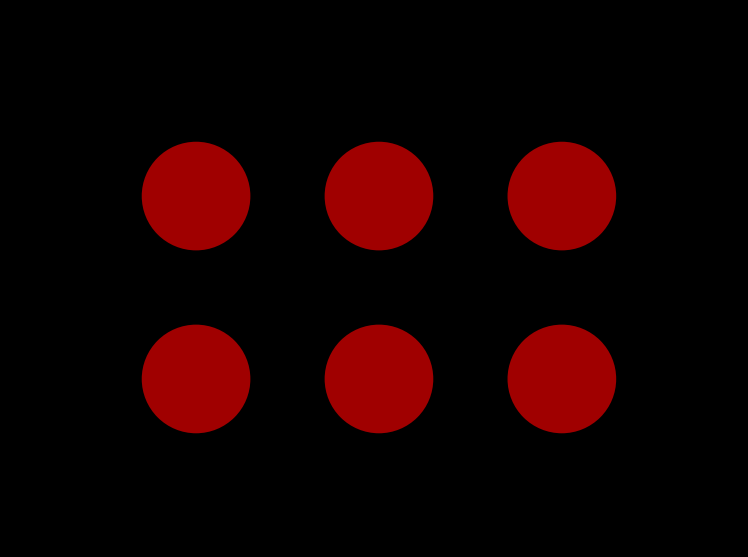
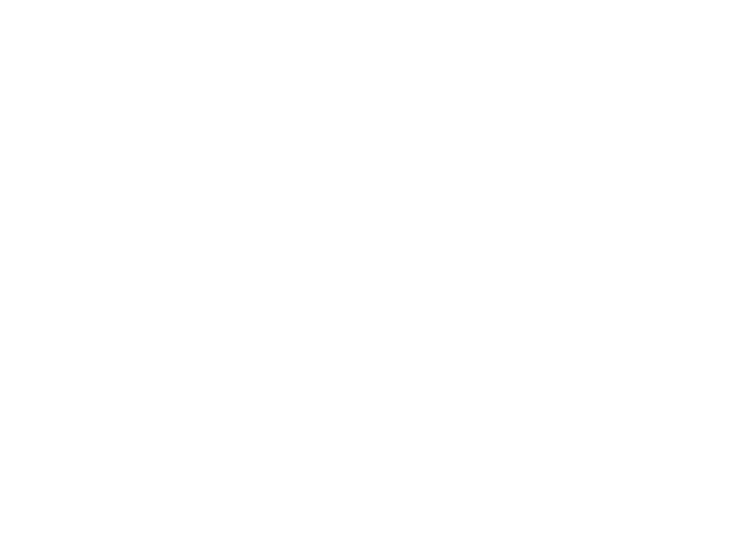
part: (196, 196) -> none
part: (378, 196) -> none
part: (561, 196) -> none
part: (196, 378) -> none
part: (378, 378) -> none
part: (561, 378) -> none

